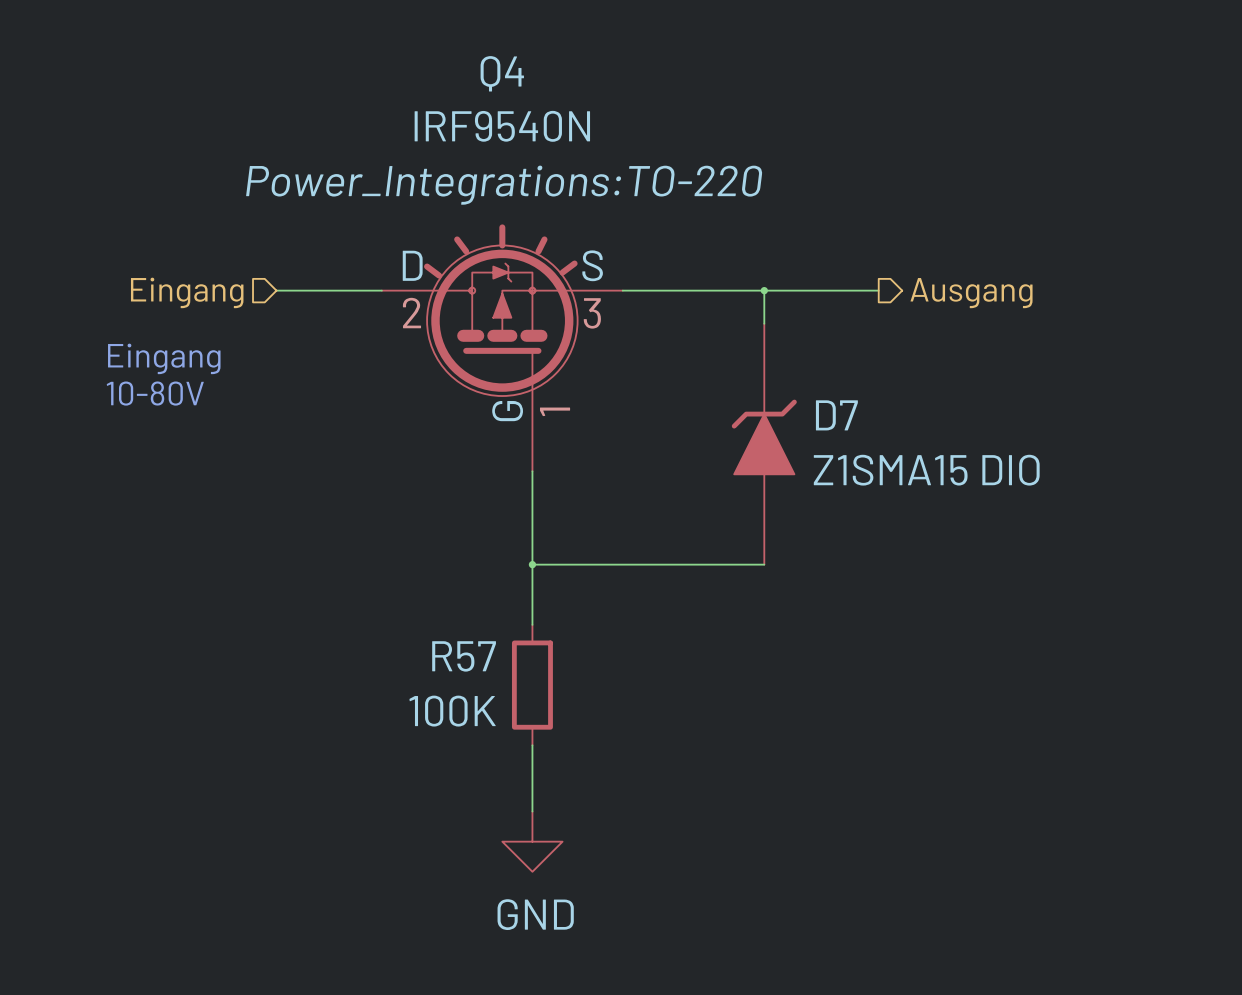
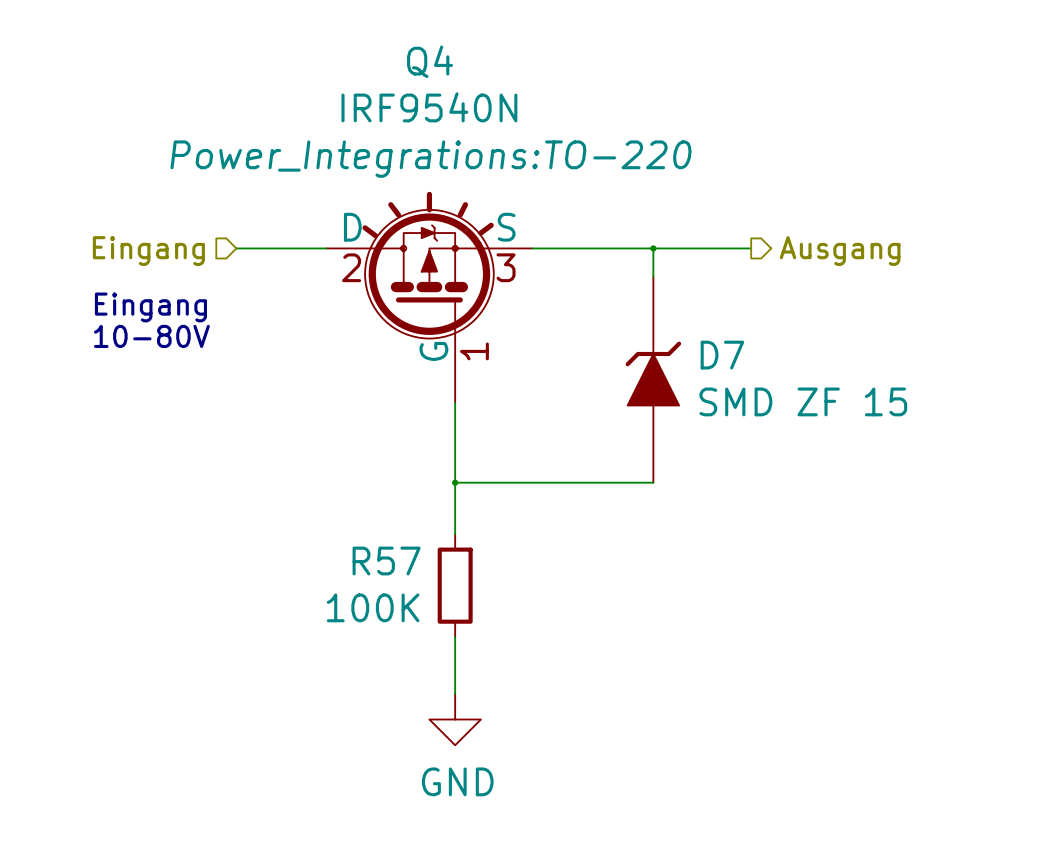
D7 value: Z1SMA15 DIO (926, 470) -> SMD ZF 15 (803, 401)

